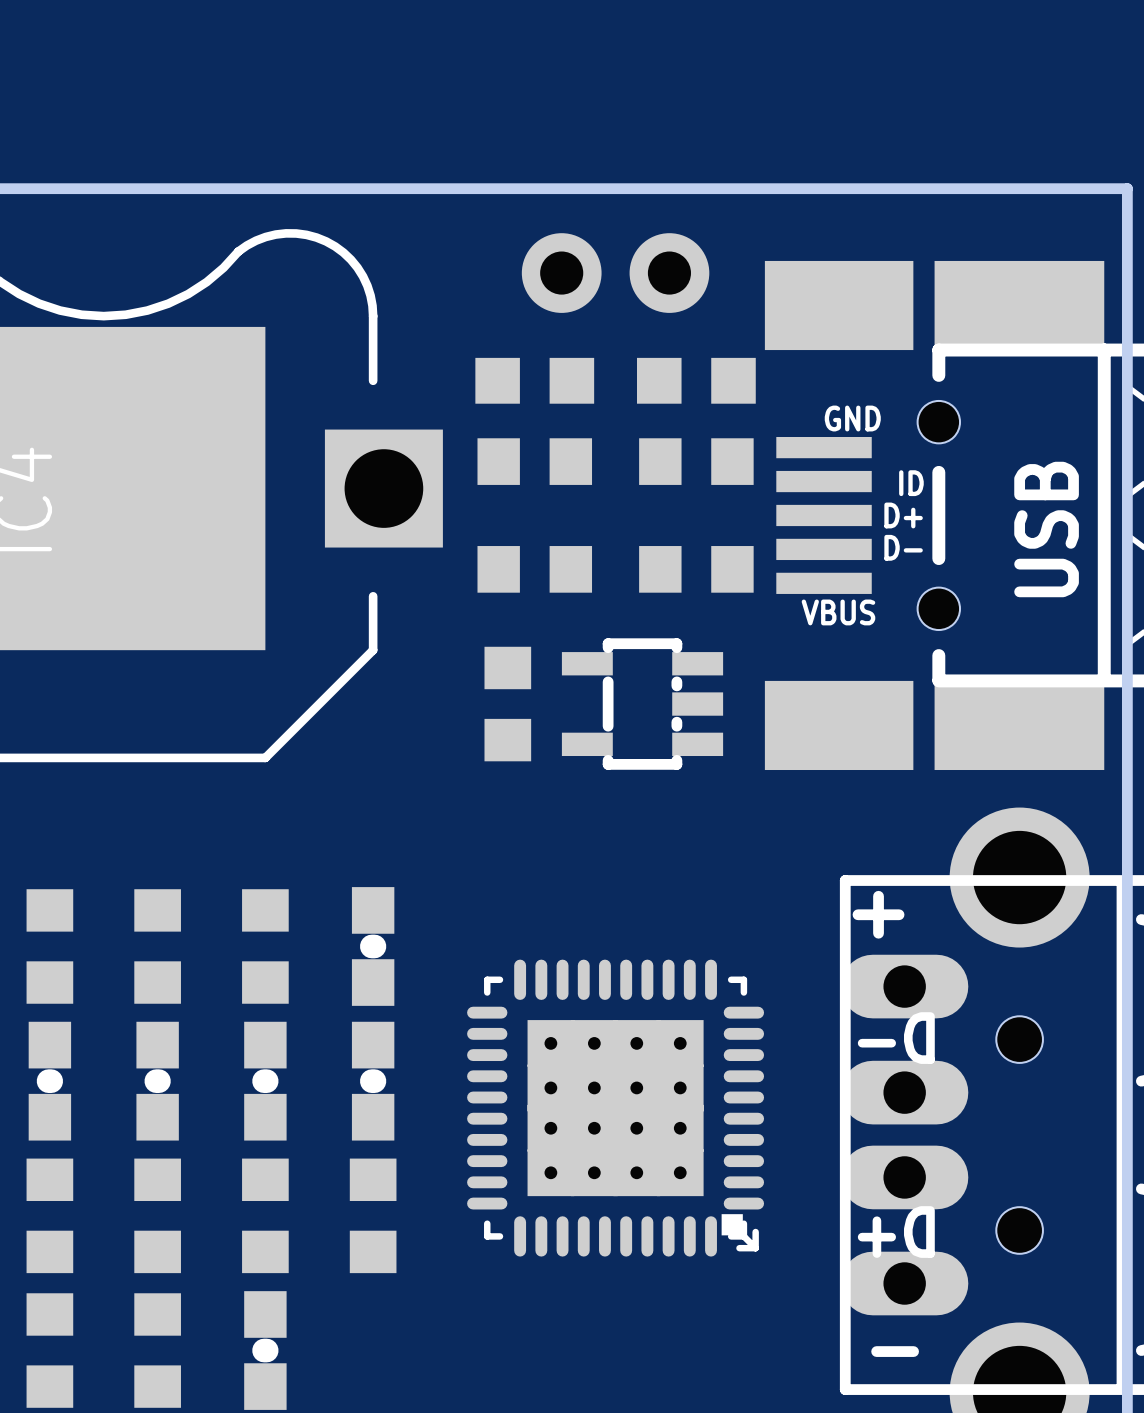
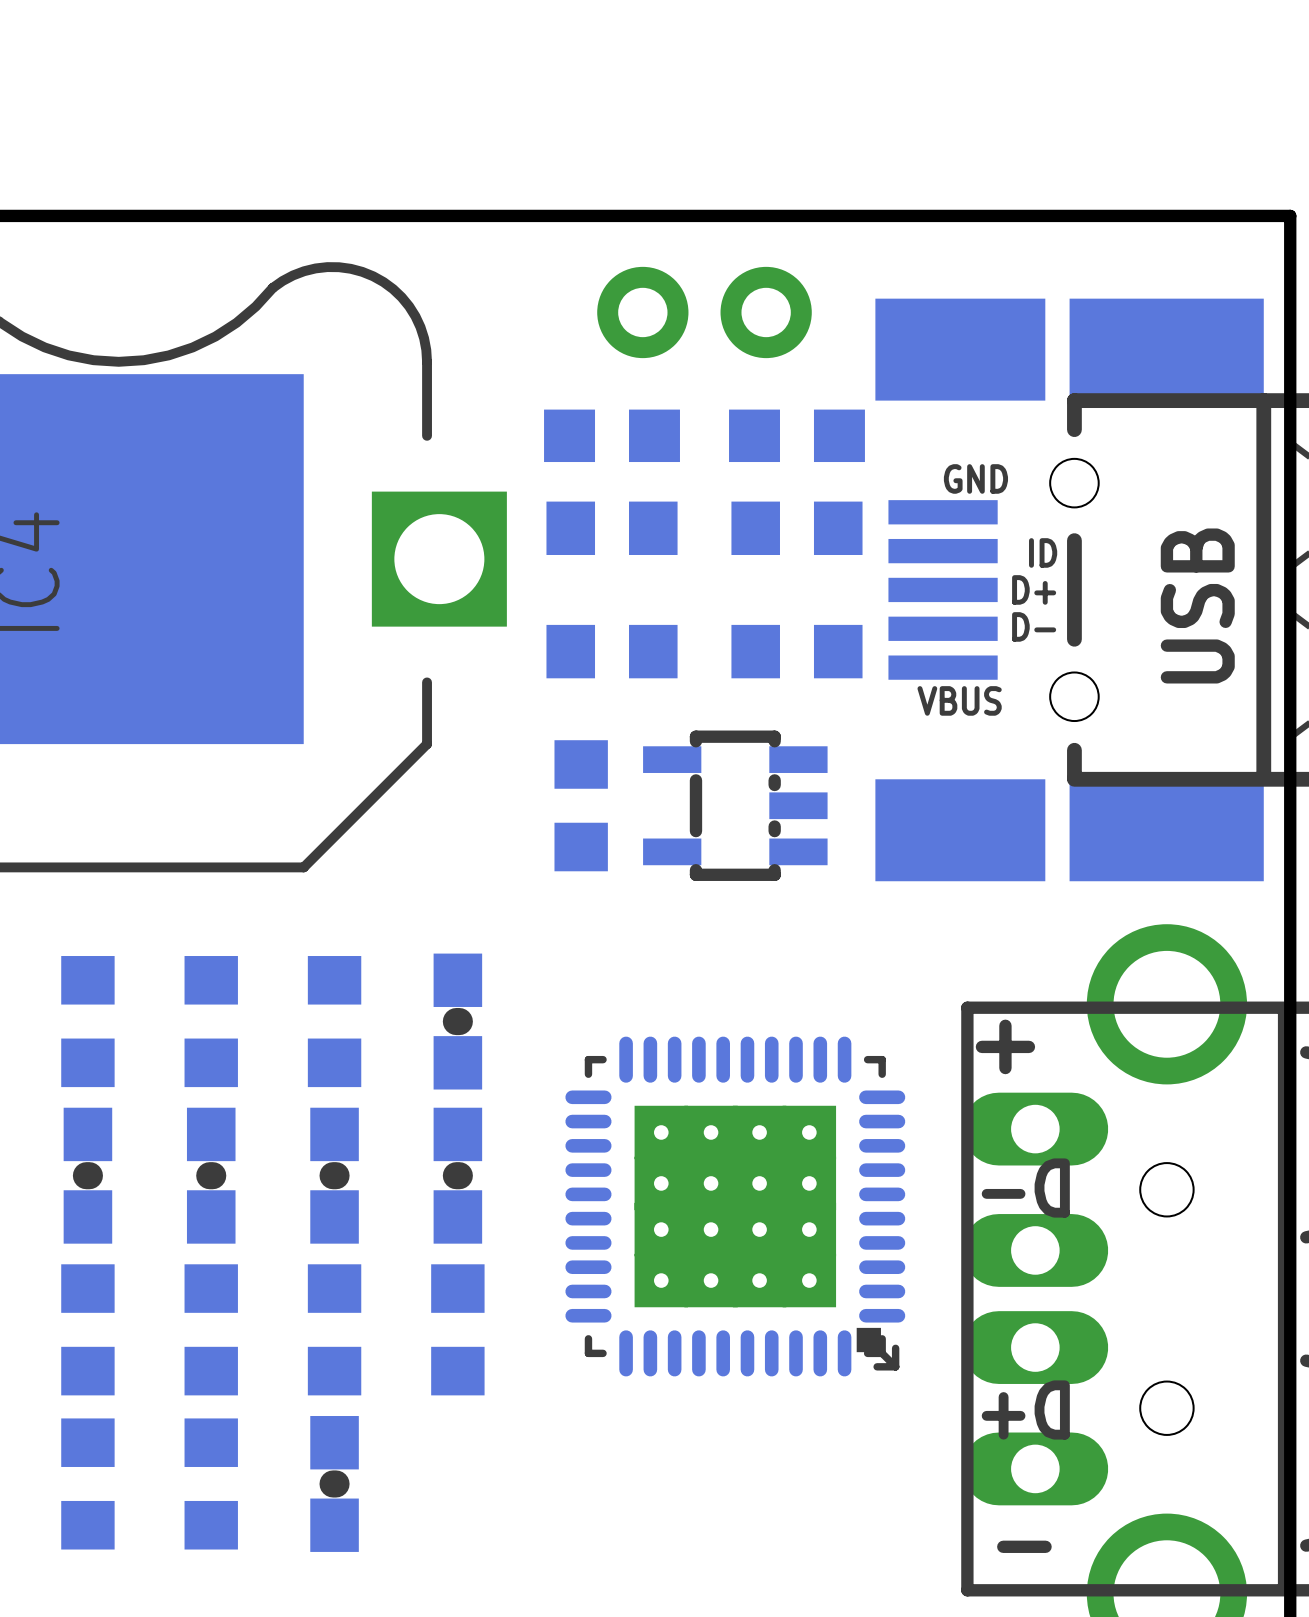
part: none -> (87, 1021)
part: none -> (211, 1021)
part: none -> (334, 1021)
part: none -> (457, 1021)
part: (49, 946) -> none
part: (157, 946) -> none
part: (265, 946) -> none
part: (373, 946) -> none
part: none -> (87, 1175)
part: none -> (211, 1175)
part: none -> (334, 1175)
part: none -> (457, 1175)
part: (49, 1081) -> none
part: (157, 1081) -> none
part: (265, 1081) -> none
part: (373, 1081) -> none
part position: (615, 1108) -> (735, 1206)
part: none -> (87, 1329)
part: none -> (211, 1329)
part: none -> (334, 1329)
part: none -> (457, 1329)
part: (49, 1215) -> none
part: (157, 1215) -> none
part: (265, 1215) -> none
part: (373, 1215) -> none
part: none -> (87, 1483)
part: none -> (211, 1483)
part: (49, 1350) -> none
part: (157, 1350) -> none
part position: (265, 1350) -> (334, 1483)

